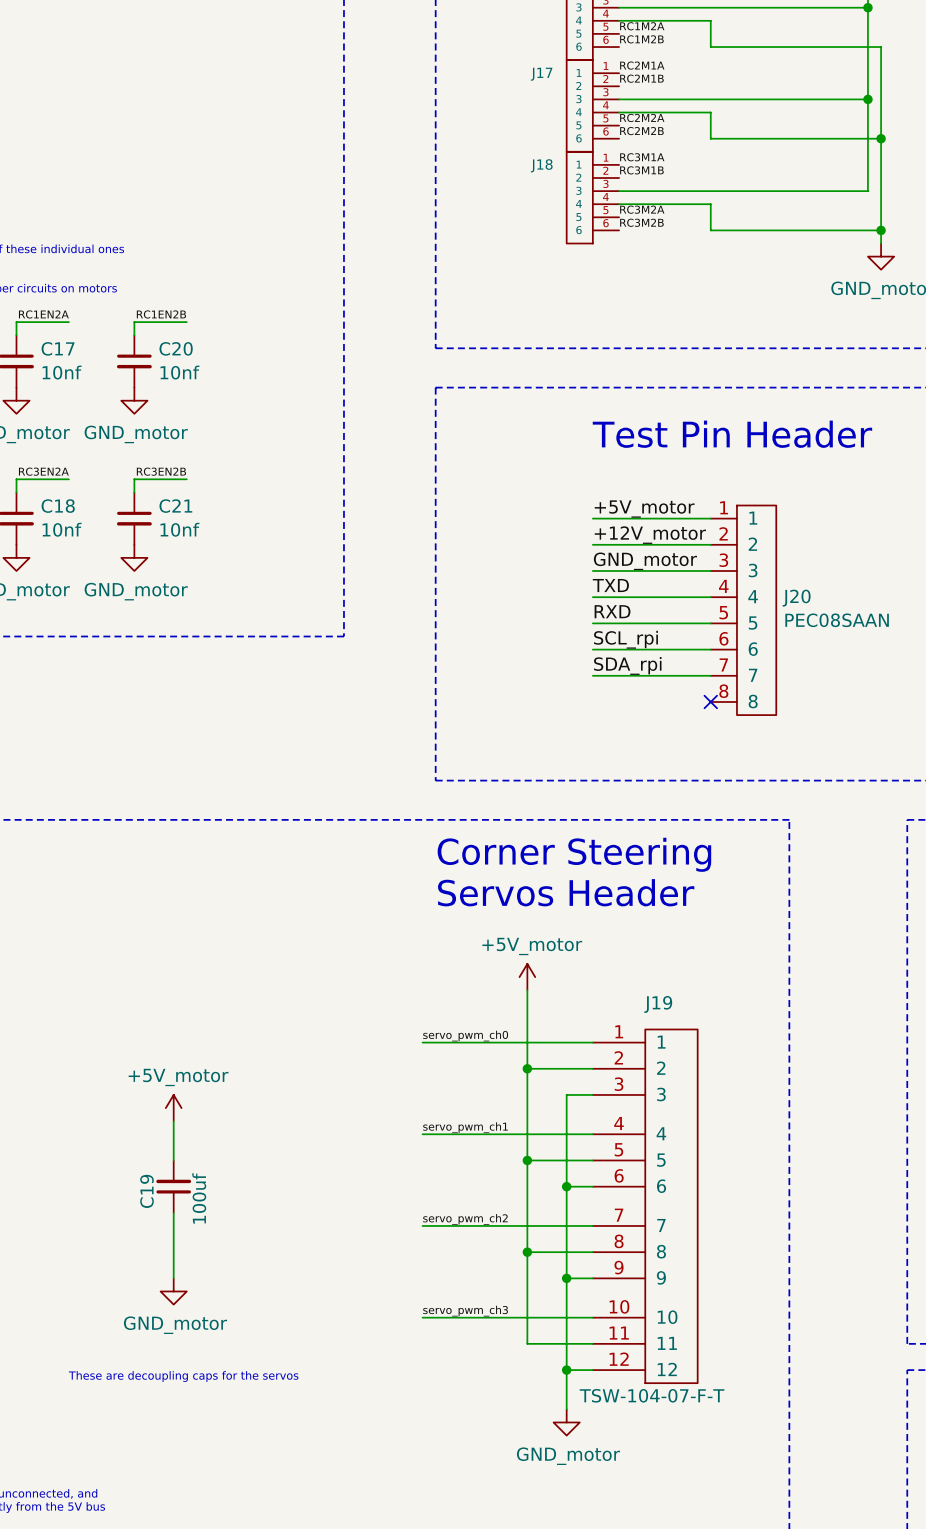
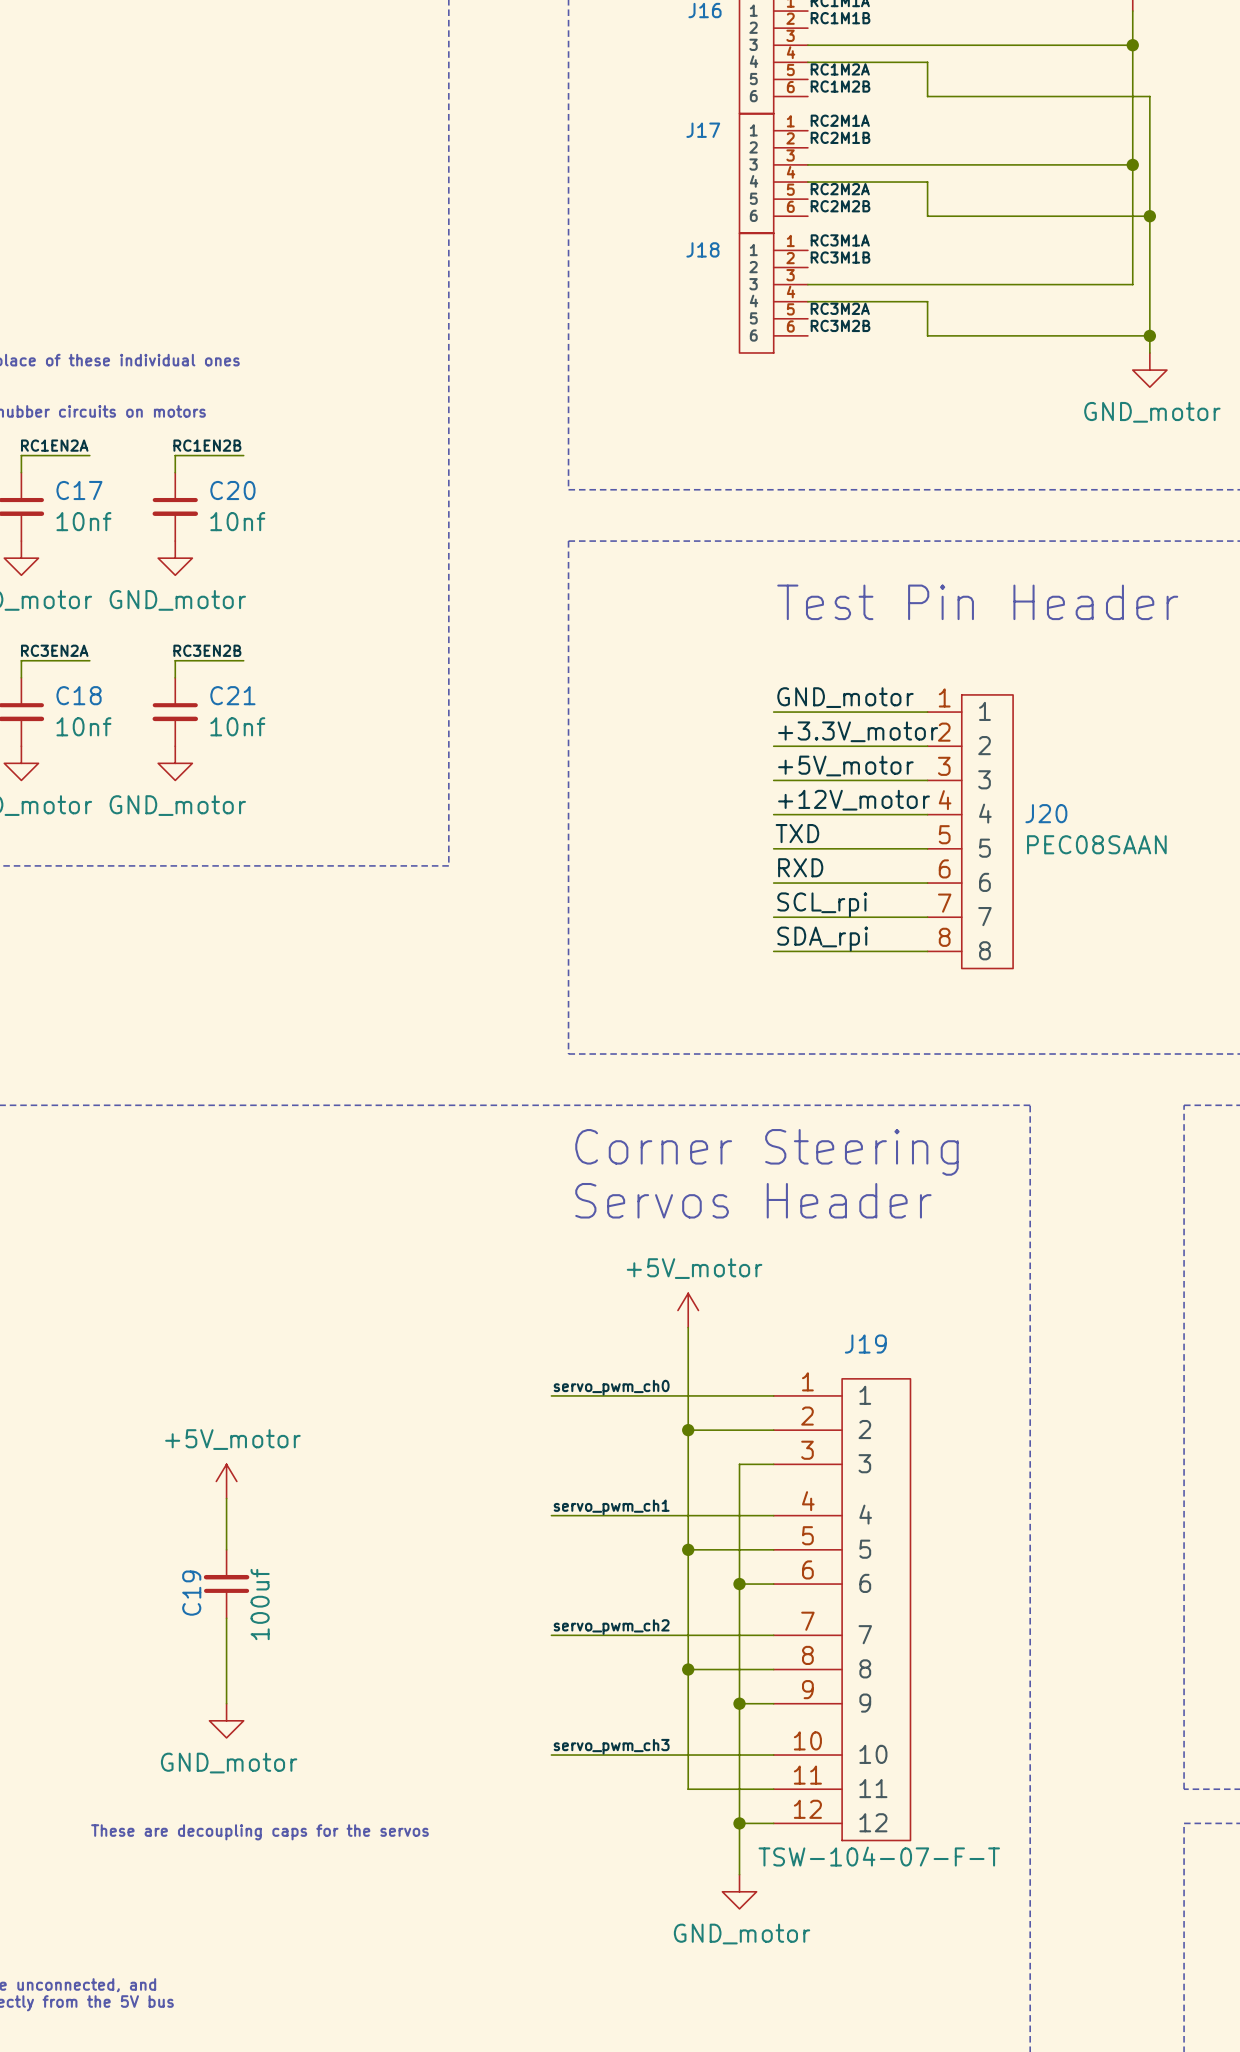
label: +5V_motor (644, 509) -> GND_motor (845, 697)
label: +12V_motor (650, 535) -> +3.3V_motor (858, 731)
label: GND_motor (645, 561) -> +5V_motor (845, 765)
label: TXD (610, 585) -> +12V_motor (854, 800)
label: RXD (612, 611) -> TXD (797, 833)
label: SCL_rpi (625, 639) -> RXD (800, 867)
label: SDA_rpi (627, 665) -> SCL_rpi (822, 904)
label: none -> SDA_rpi (822, 939)
wire: none -> (773, 951) (927, 951)
no-connect mark: (710, 701) -> none

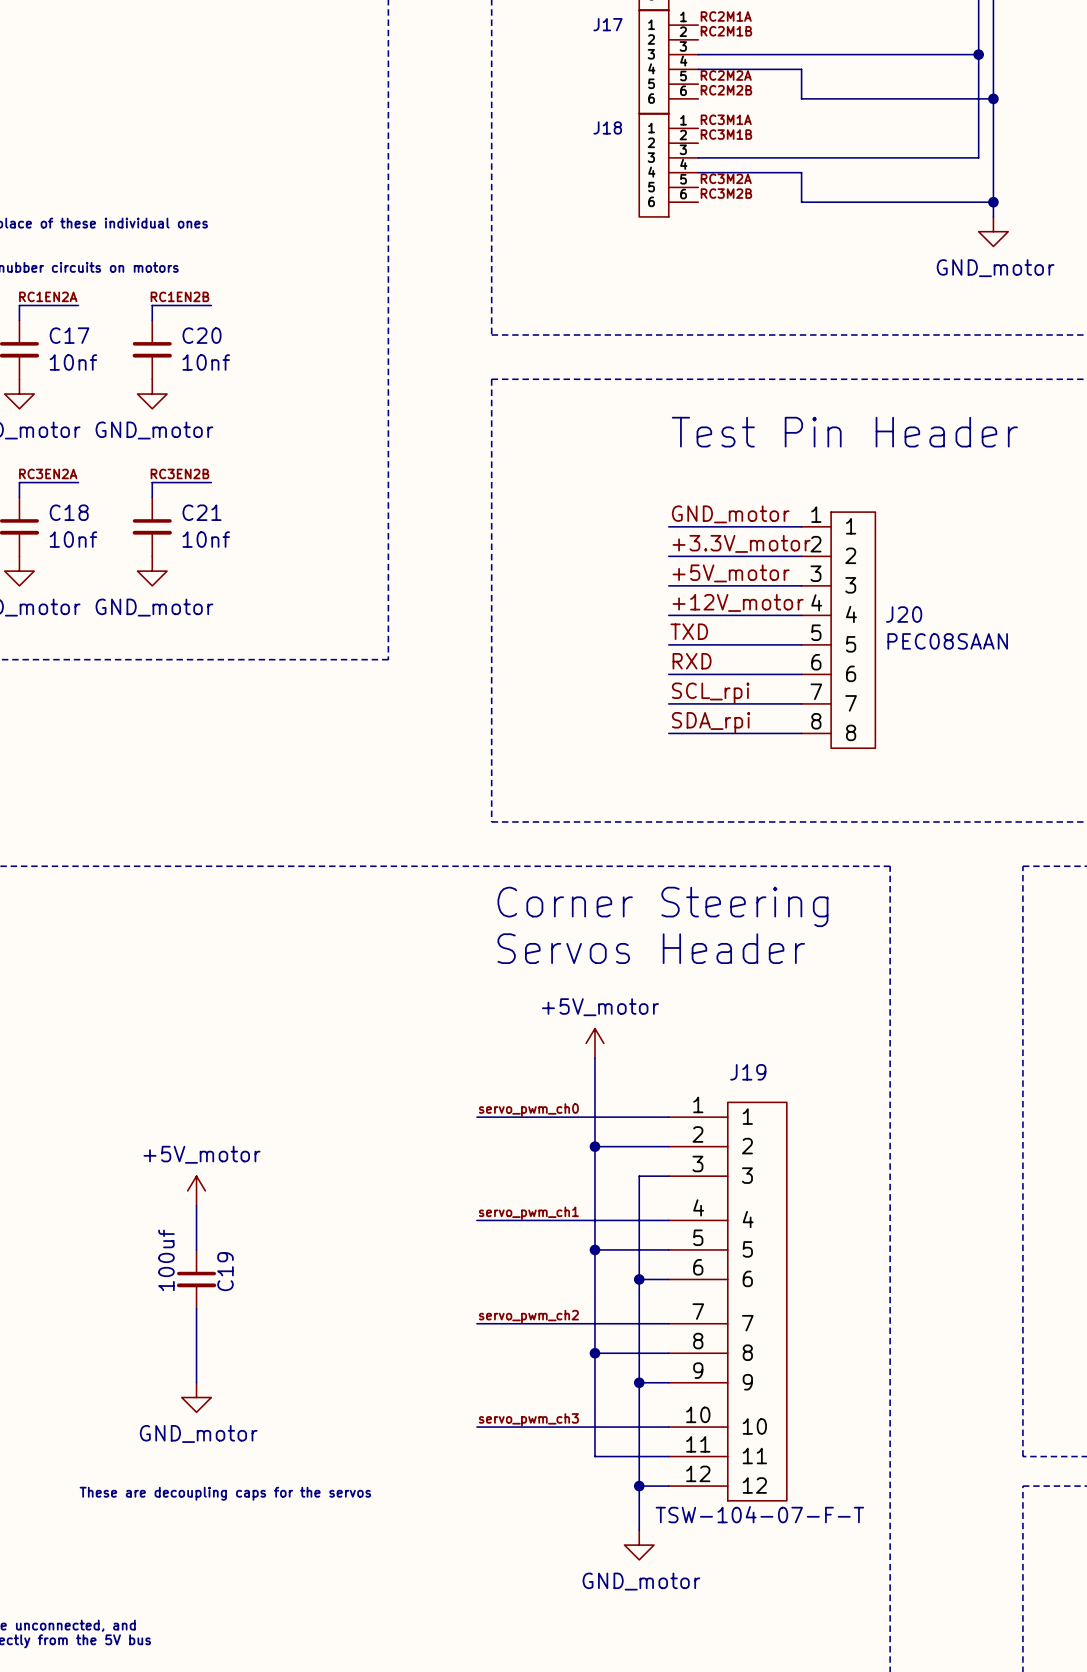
C19 rotation: 0° (226, 1583) -> 180° (196, 1279)

